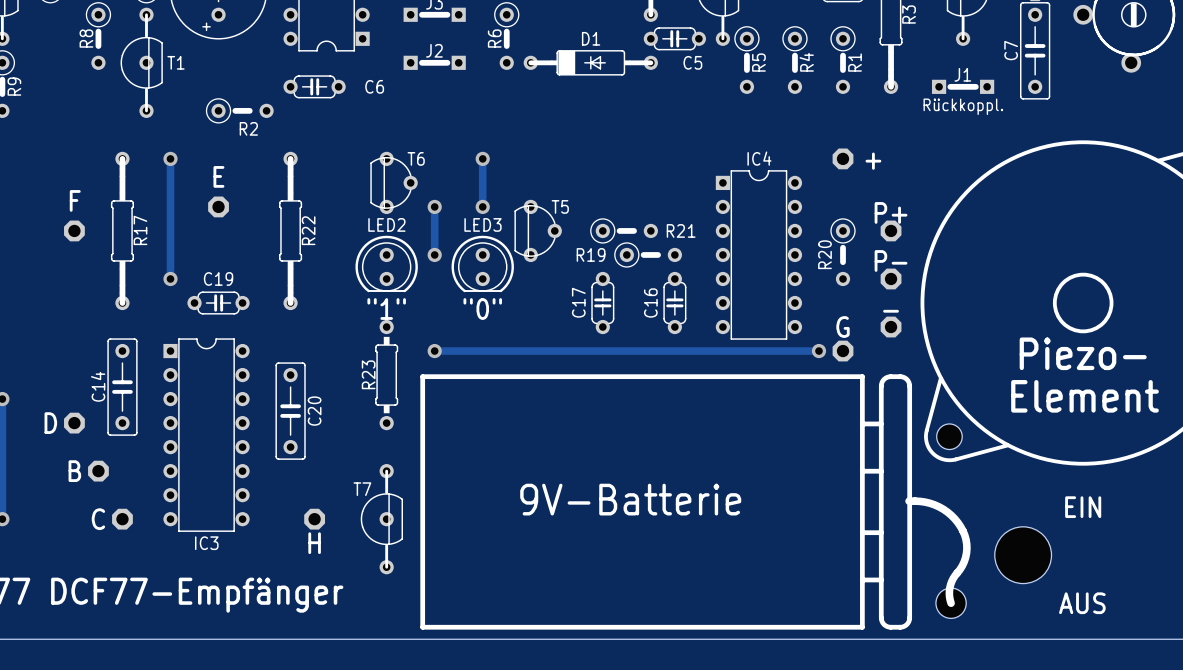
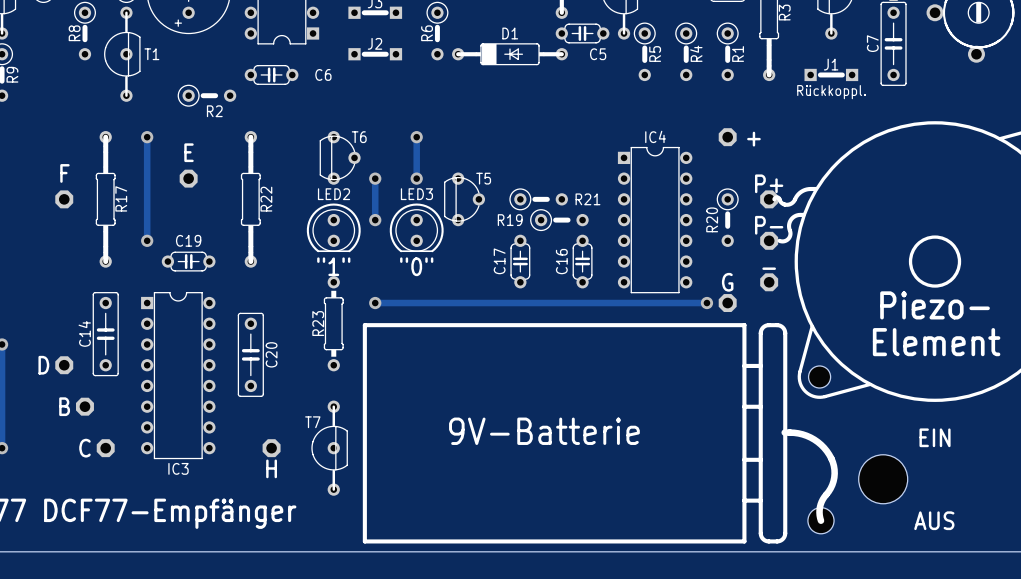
line: none -> (815, 188) (802, 190) (788, 204) (782, 203) (777, 197) (774, 199)
line: none -> (803, 214) (796, 215) (791, 218) (789, 225) (789, 237) (785, 241) (779, 240)

